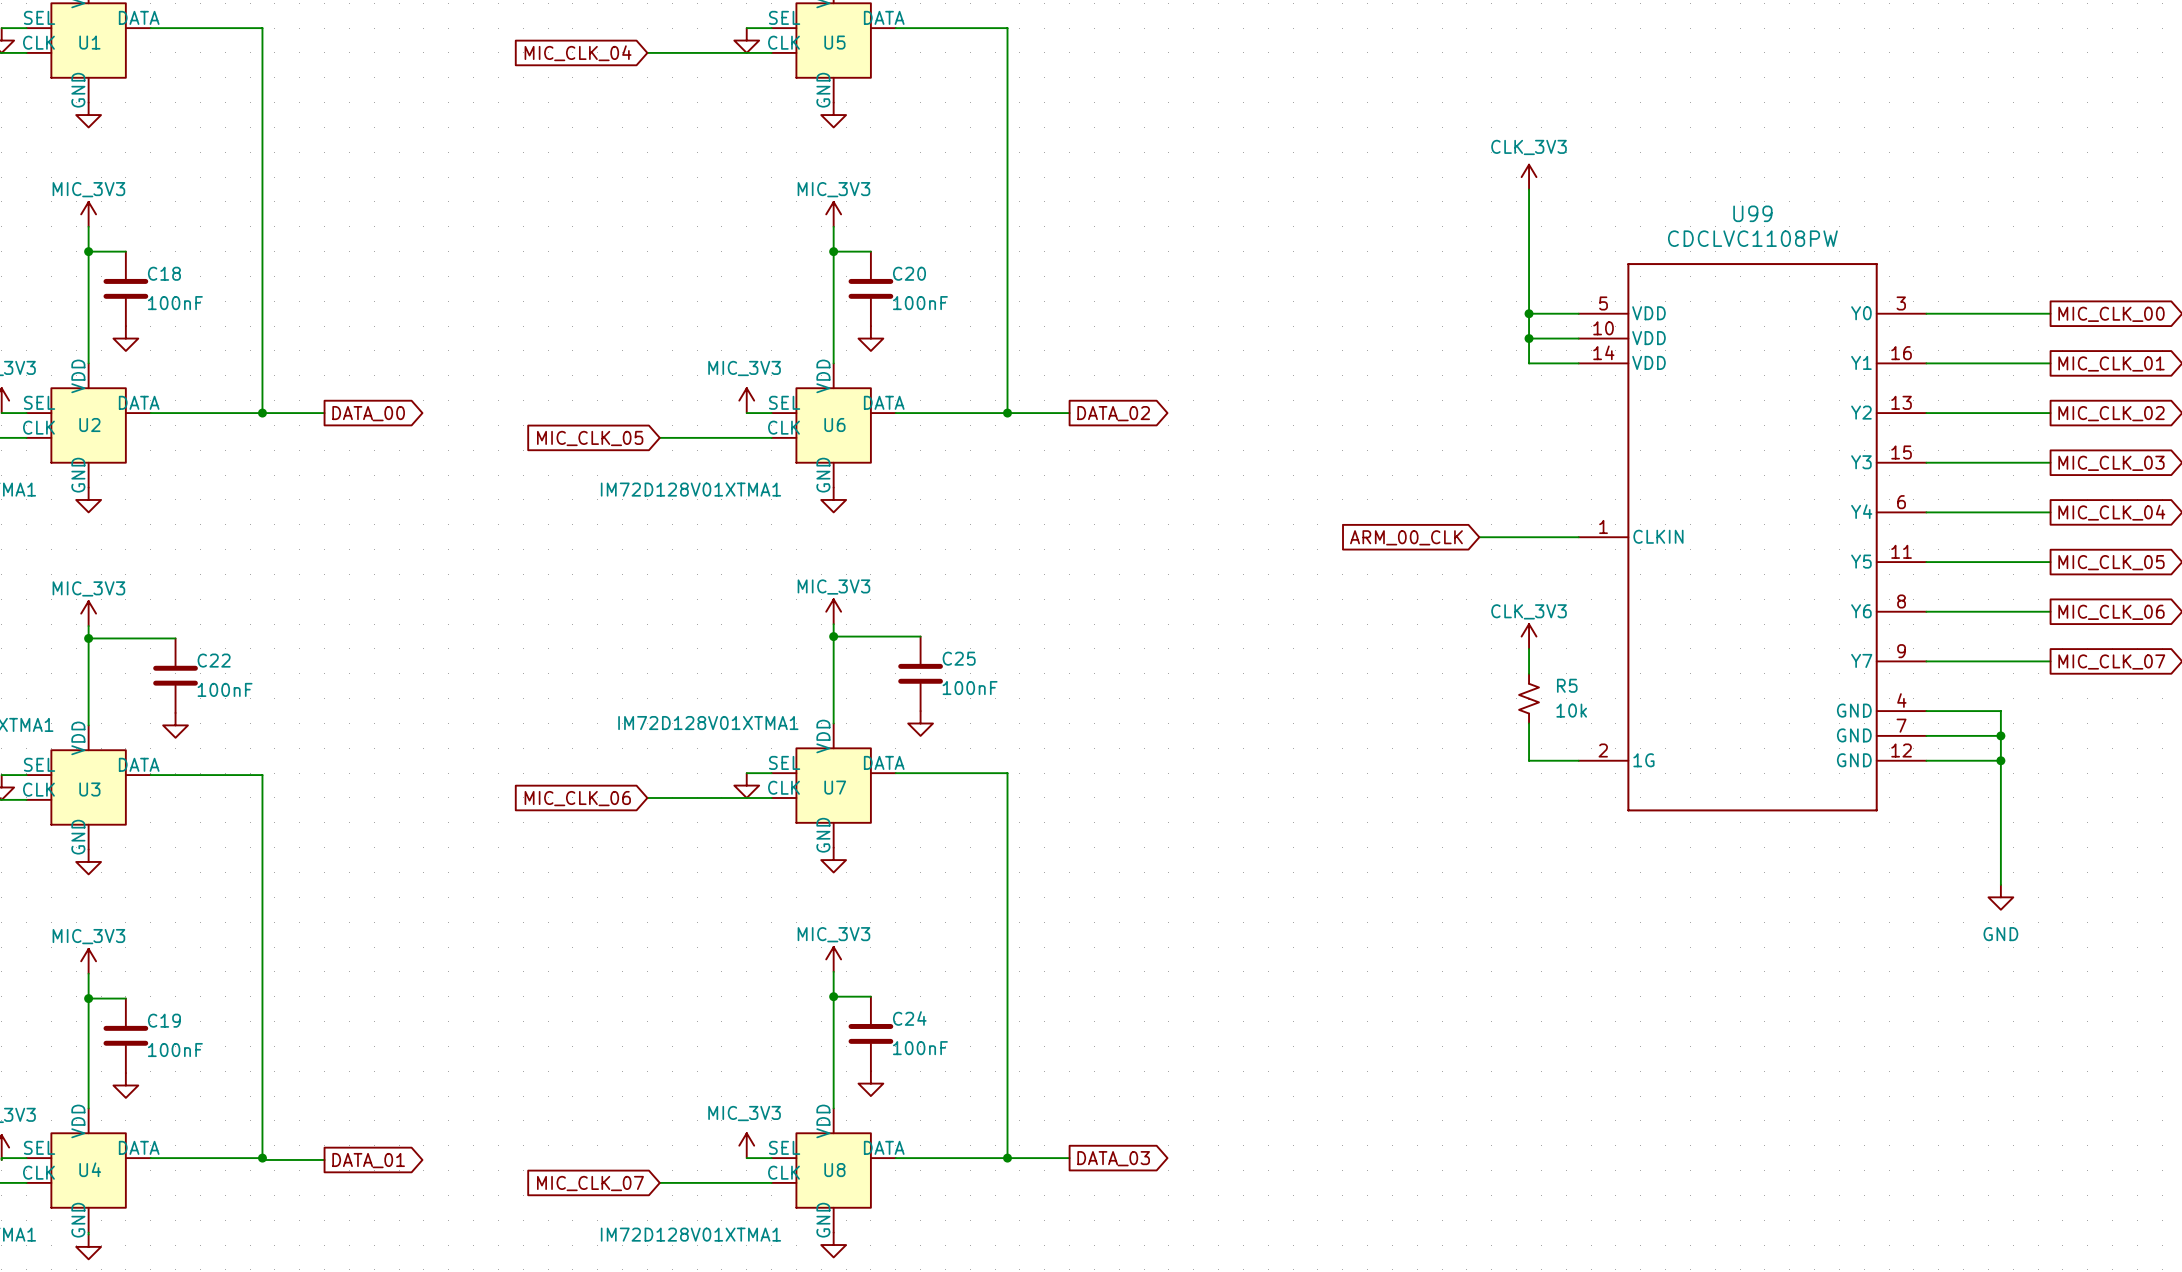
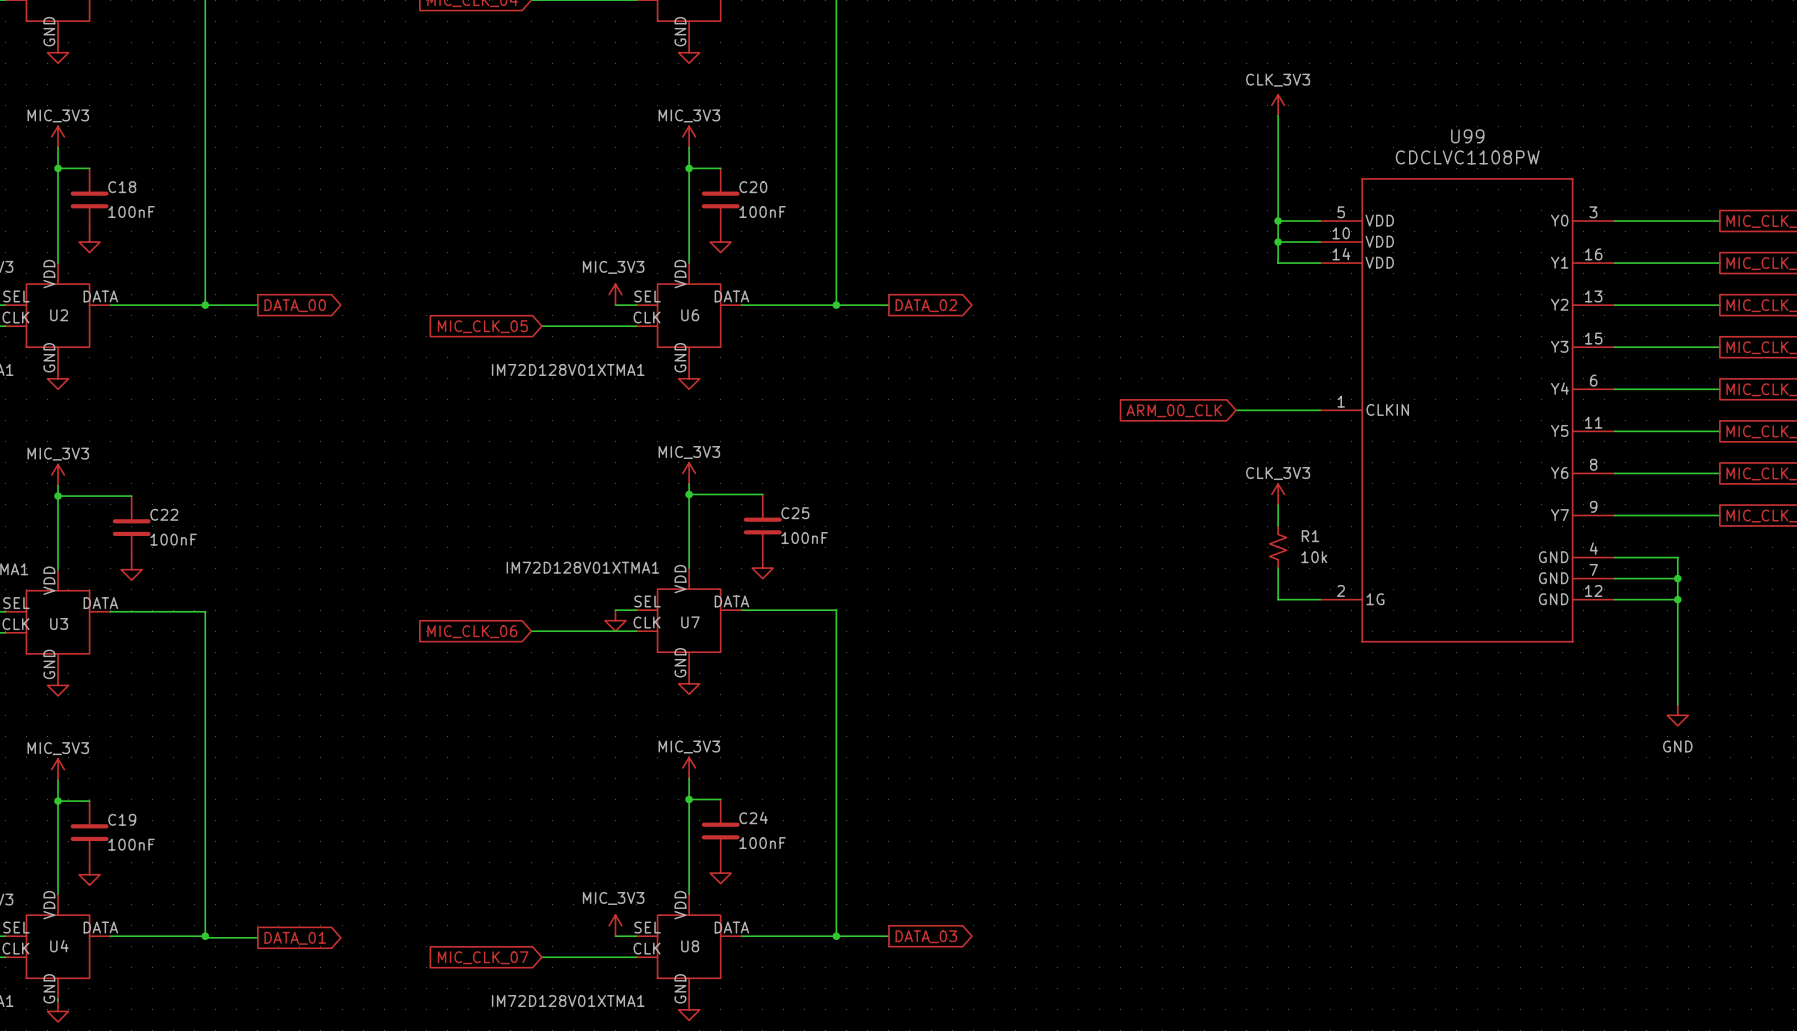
R5 name: R5 (1567, 685) -> R1 (1310, 536)

